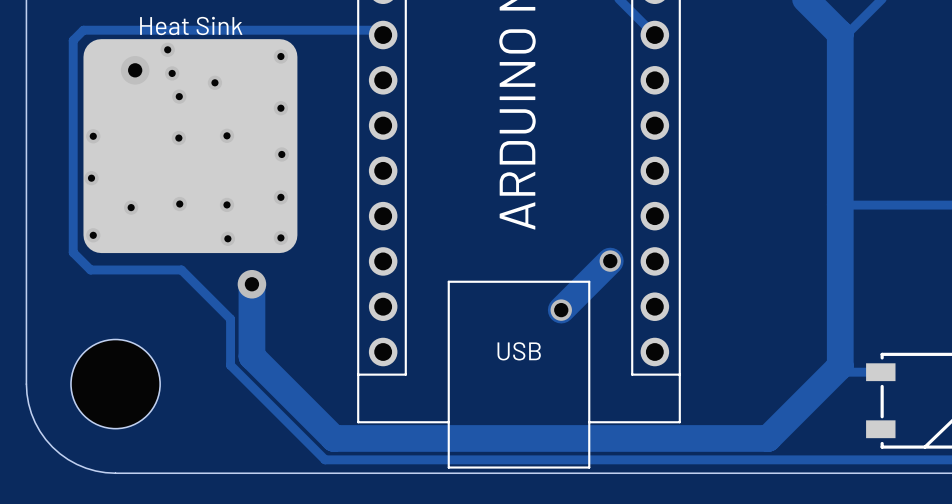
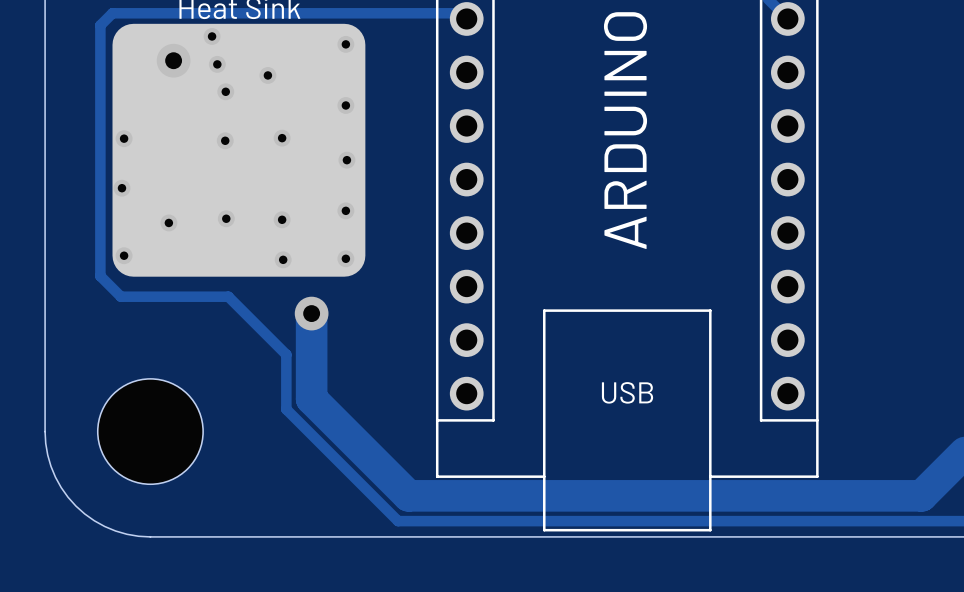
track: (610, 261) (561, 310) -> none
via: (610, 261) -> none
via: (561, 310) -> none

